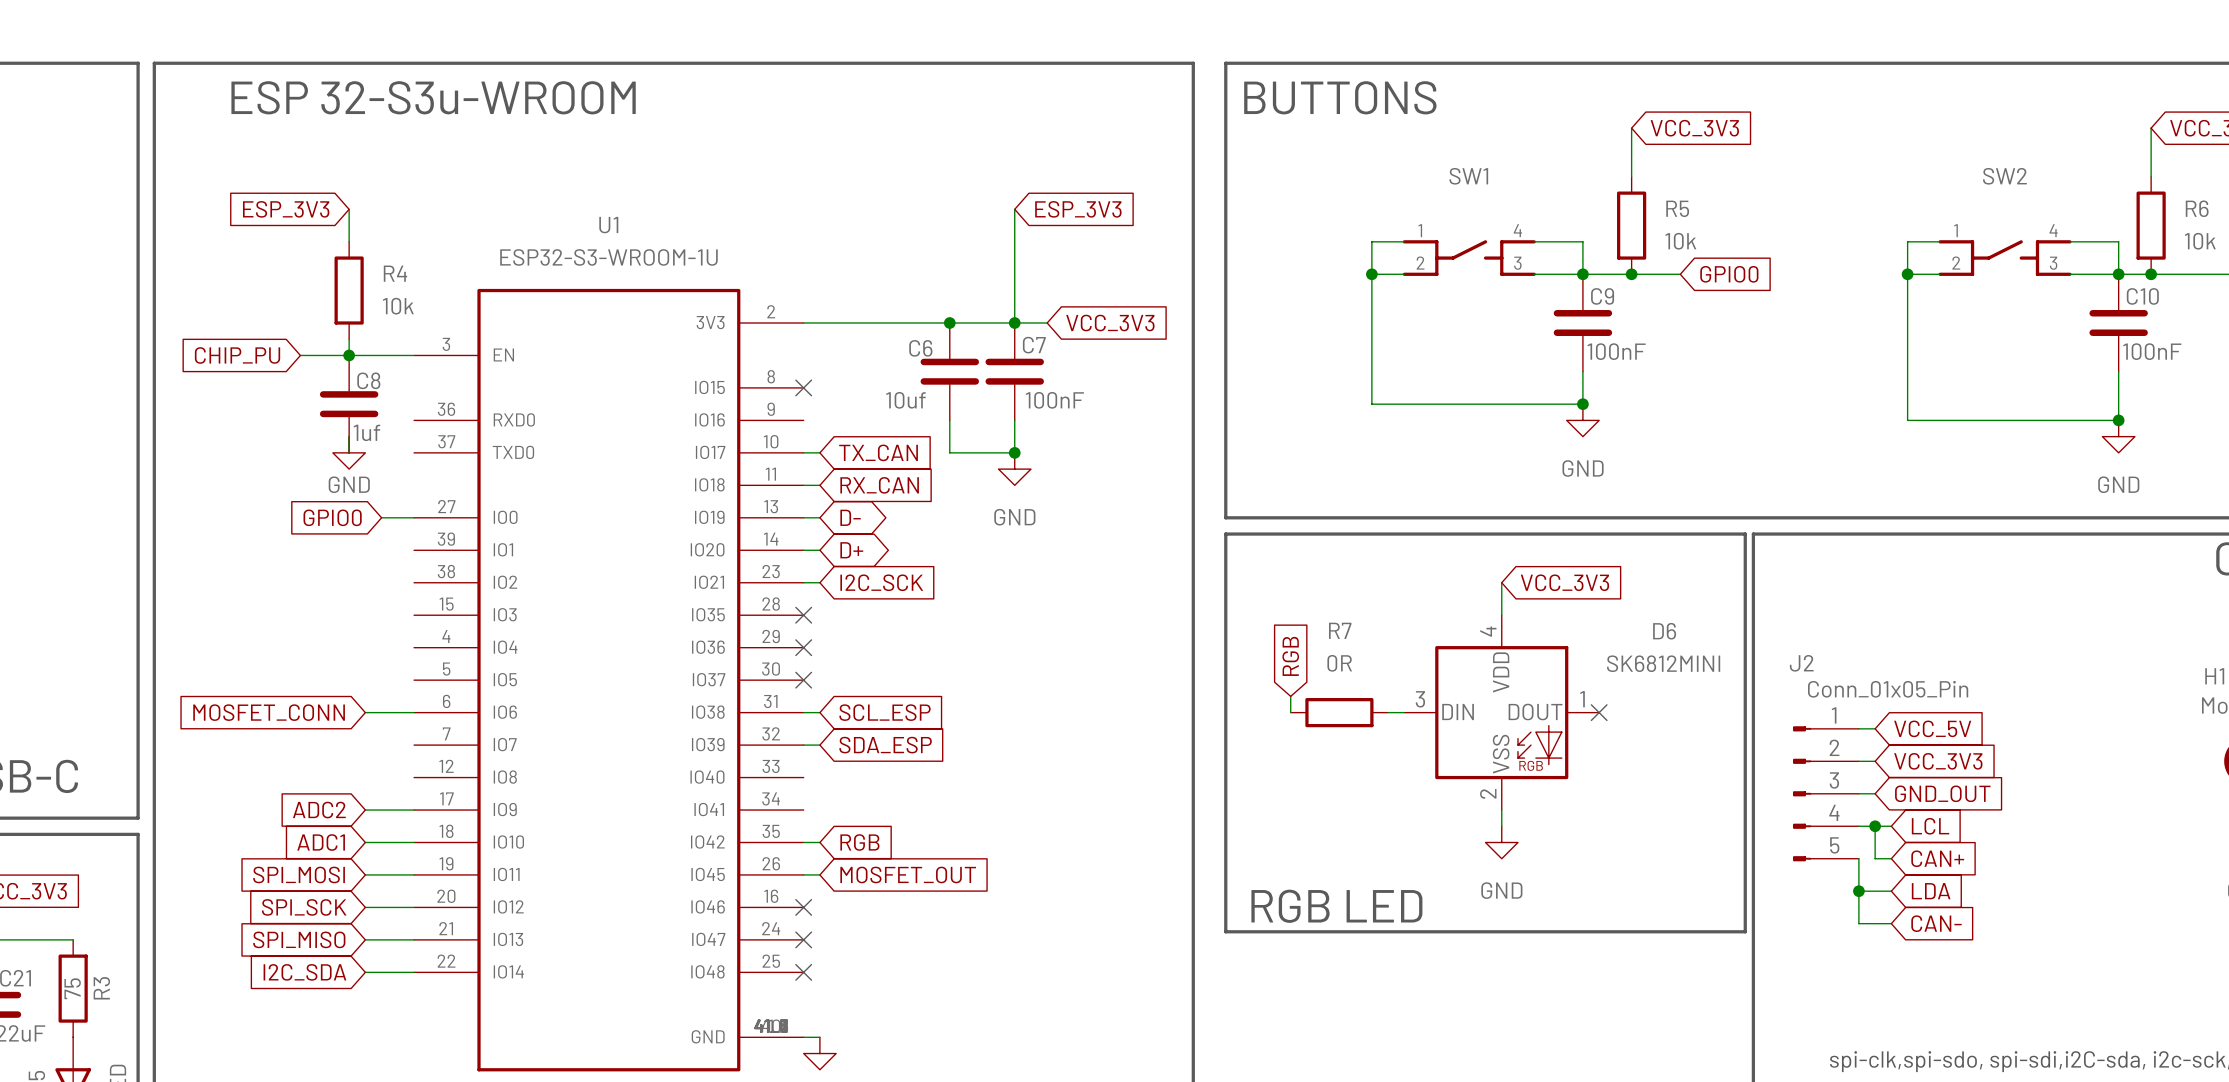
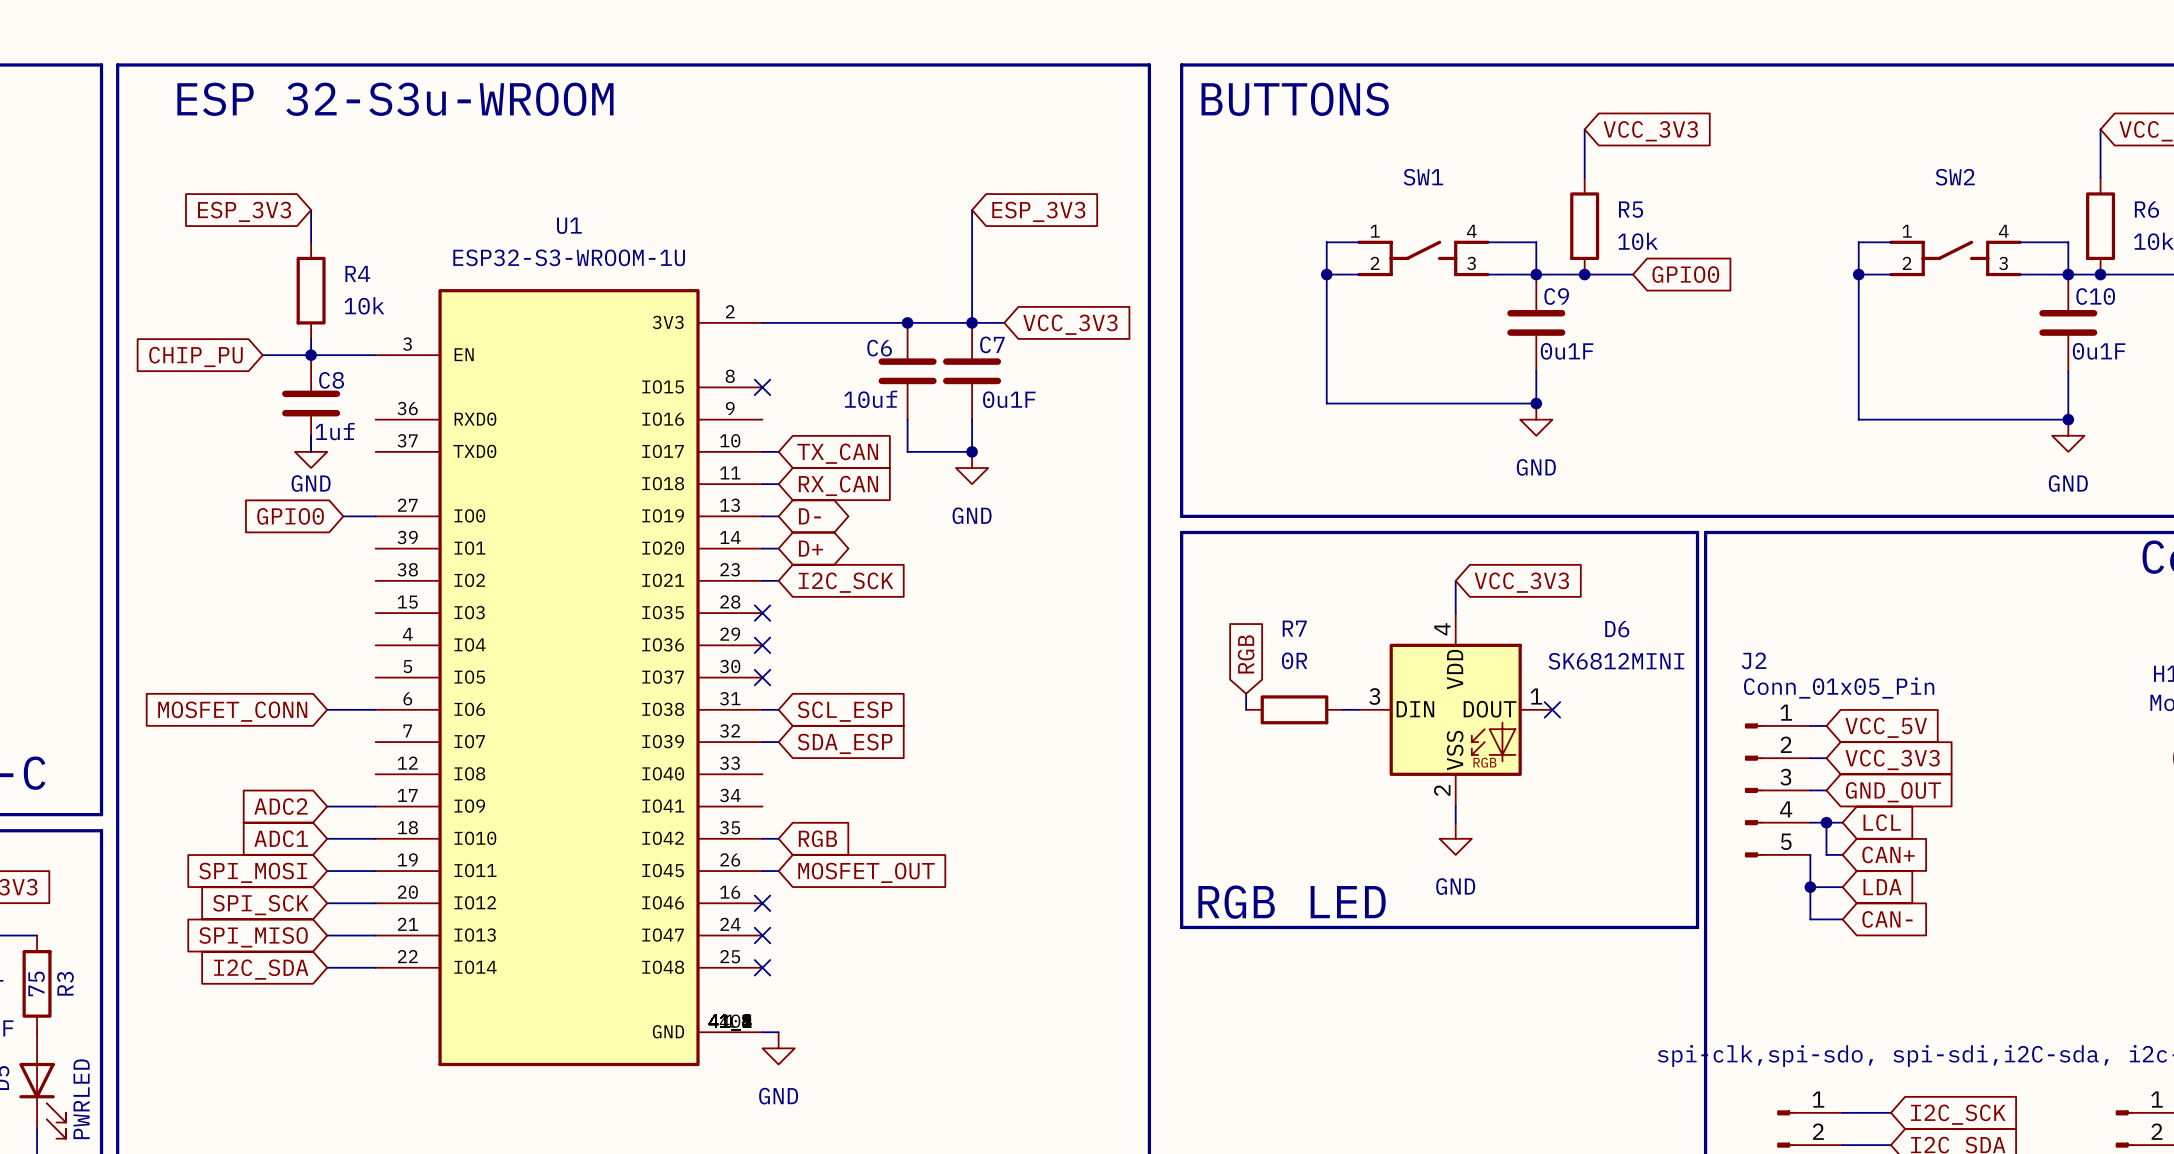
C9 value: 100nF (1616, 351) -> 0u1F (1567, 351)
C10 value: 100nF (2152, 351) -> 0u1F (2099, 351)
C7 value: 100nF (1054, 400) -> 0u1F (1009, 399)

